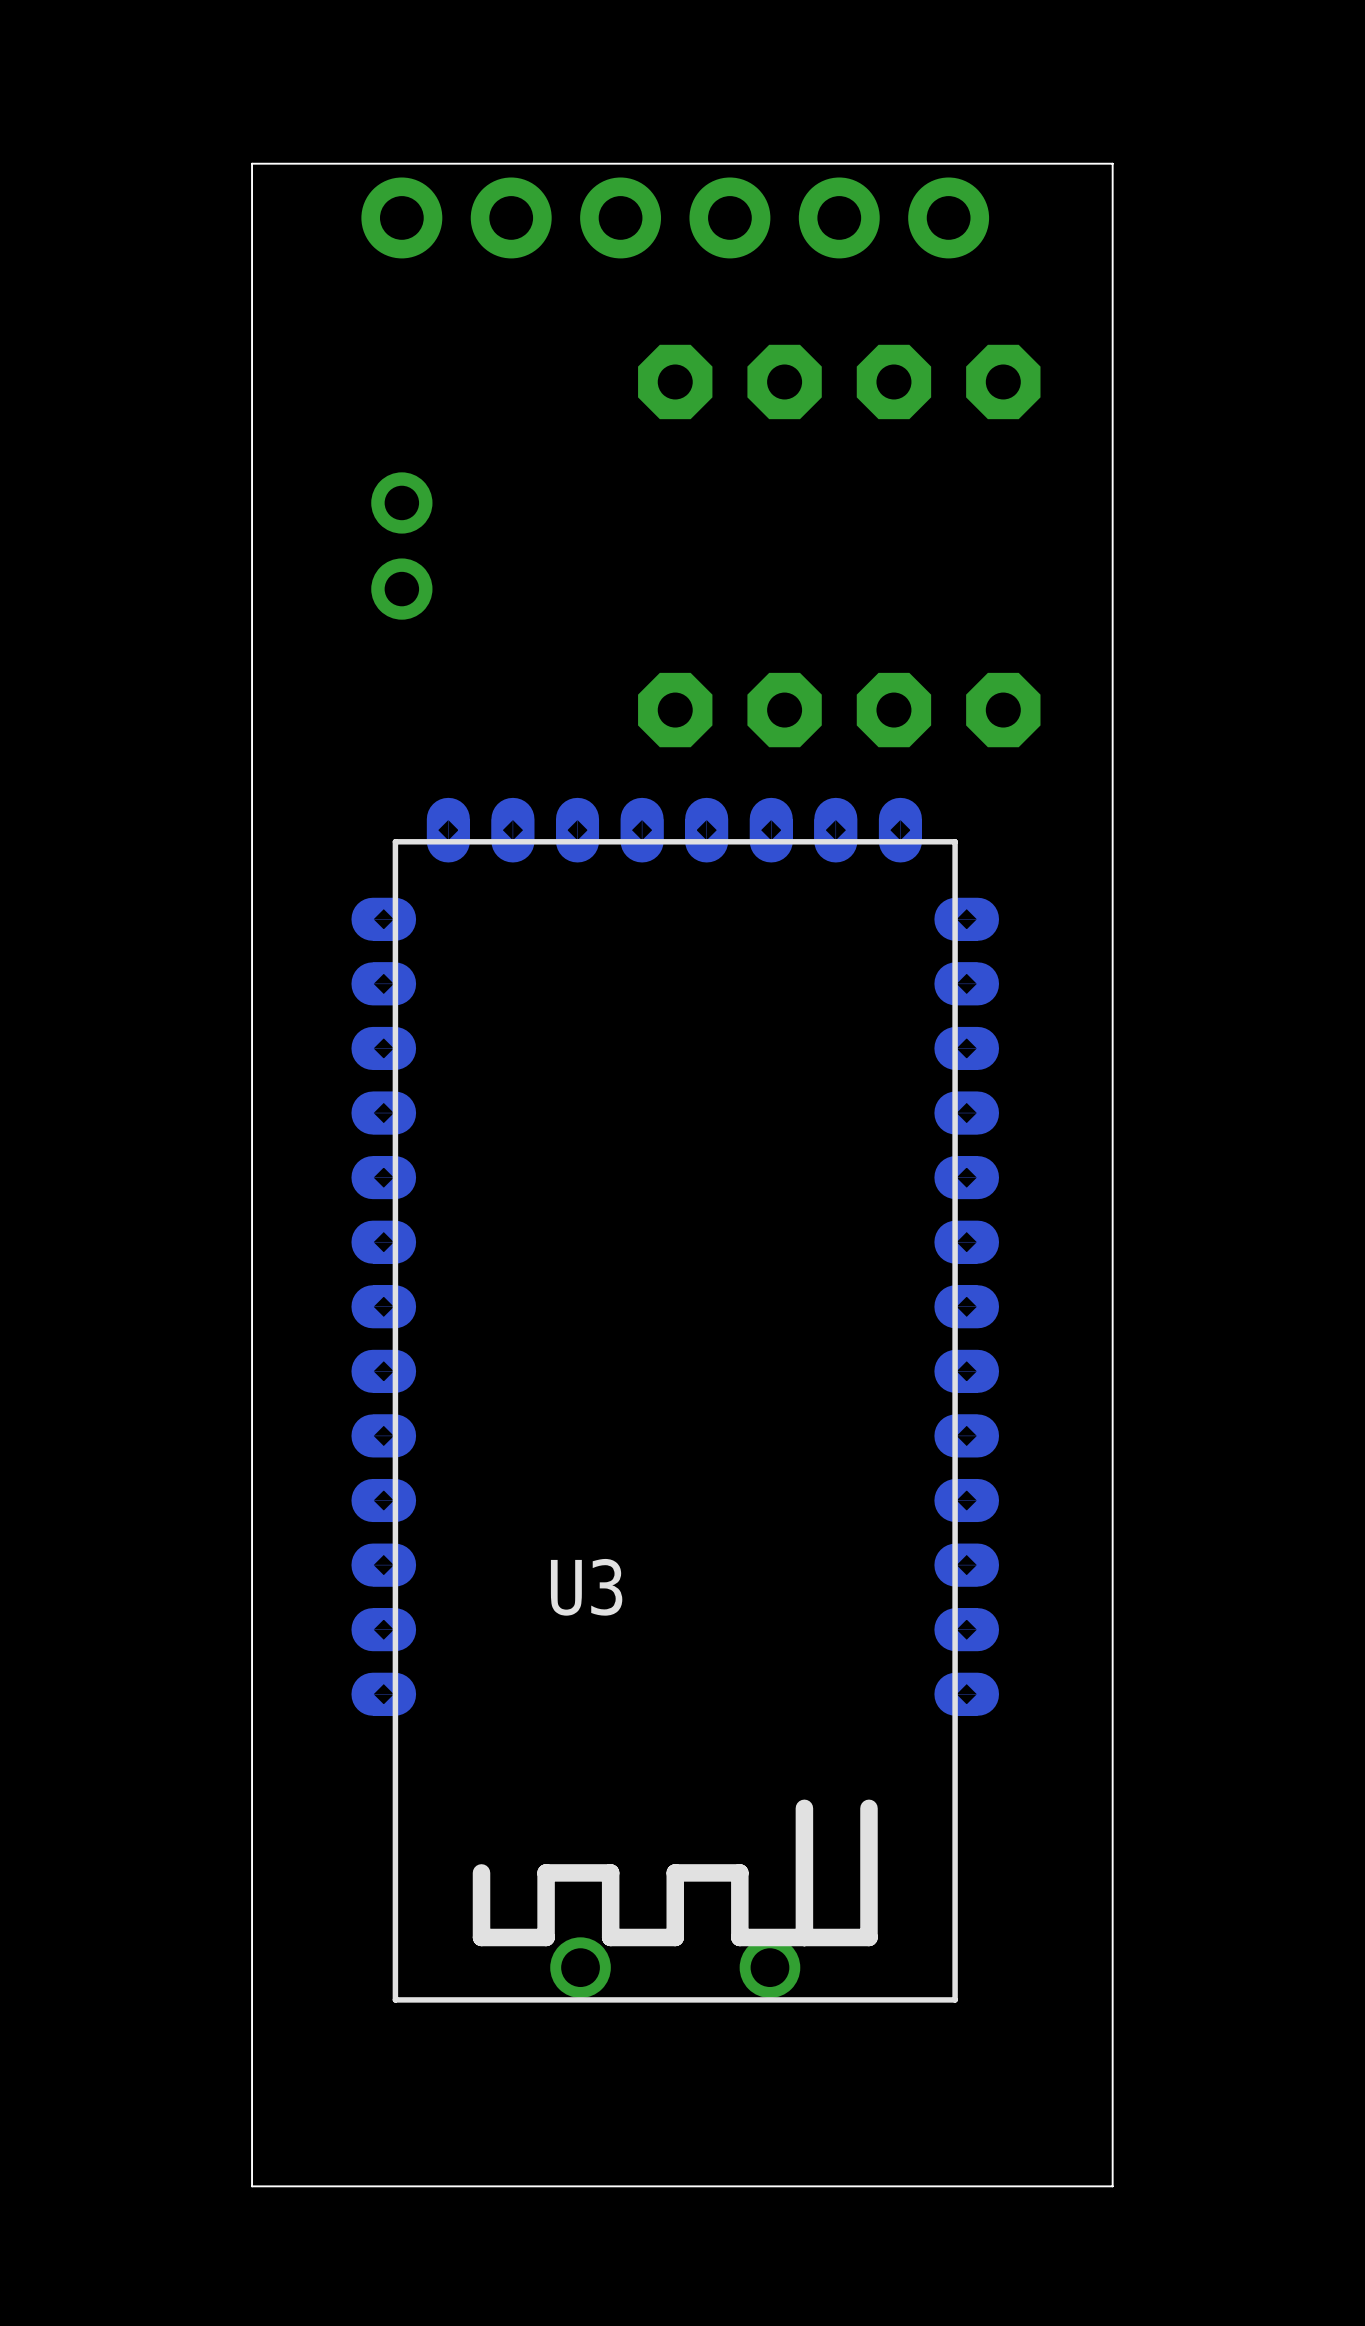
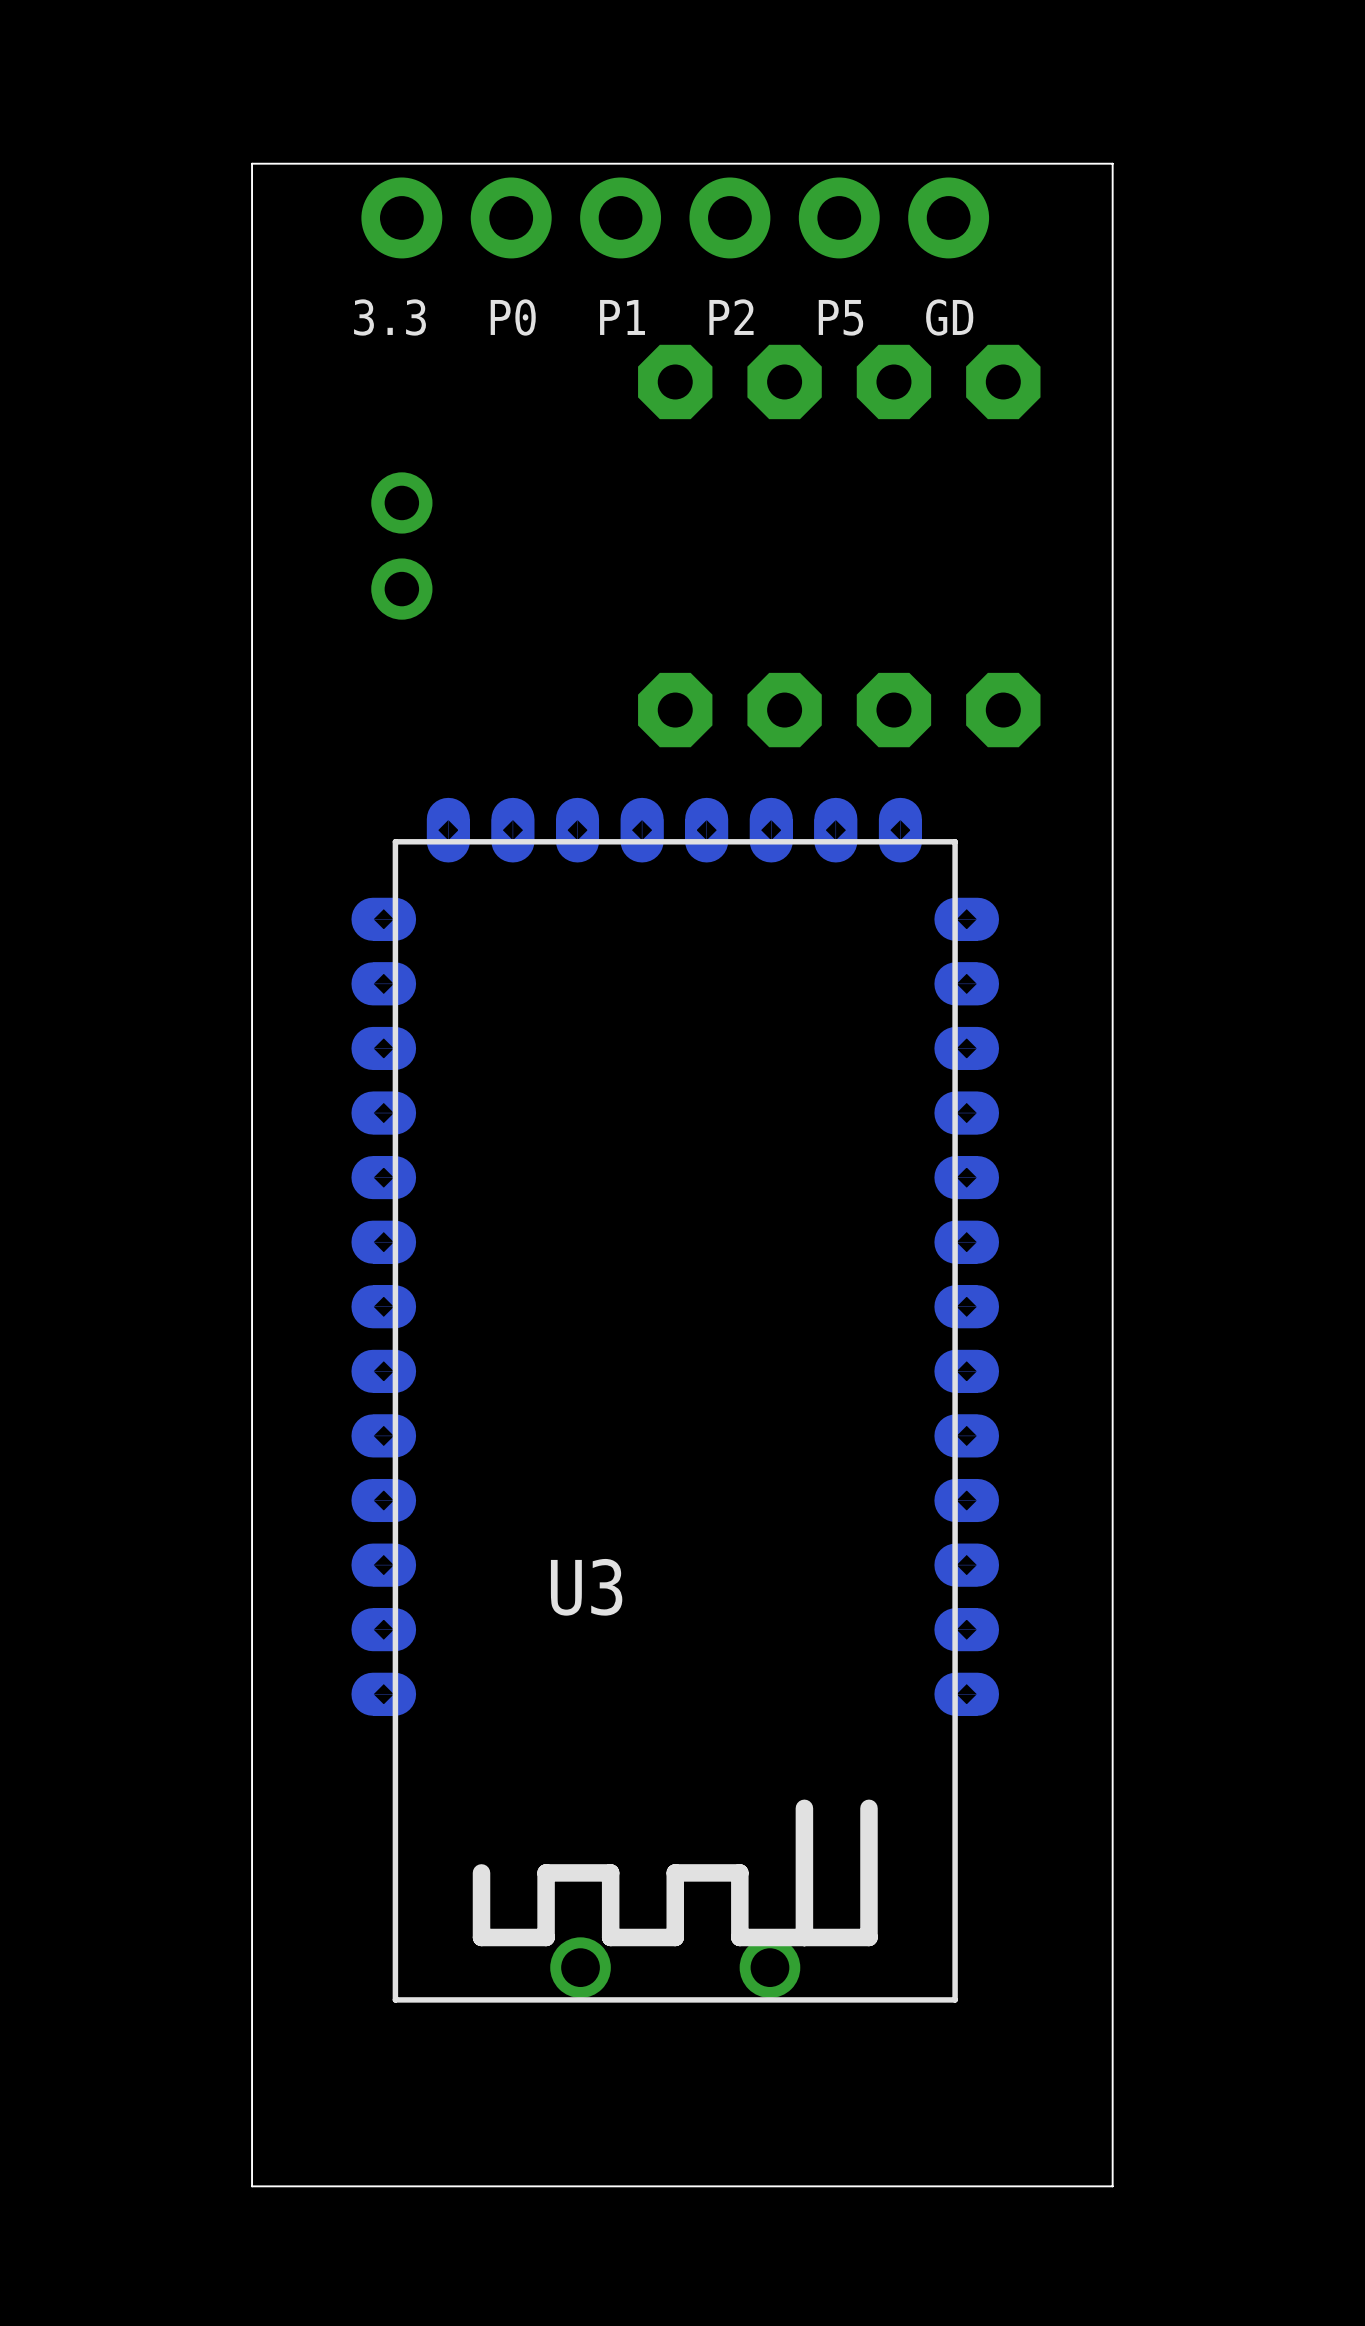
text: none -> 3.3 (390, 317)
text: none -> P0 (513, 317)
text: none -> P1 (622, 317)
text: none -> P2 (731, 317)
text: none -> P5 (840, 317)
text: none -> GD (949, 317)

